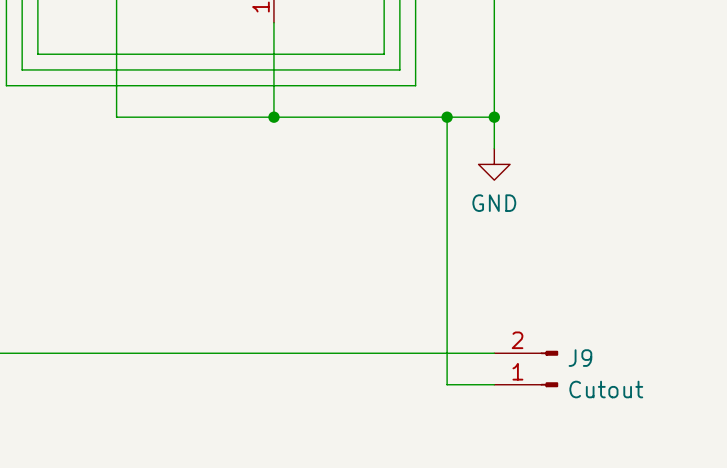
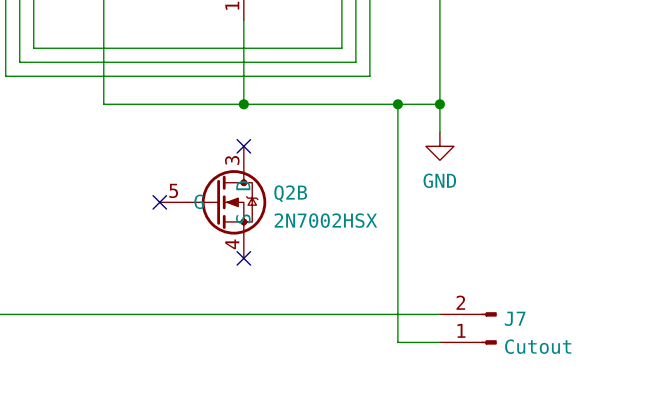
no-connect mark: none -> (243, 146)
no-connect mark: none -> (159, 202)
Q2B: none -> 2N7002HSX (213, 202)
no-connect mark: none -> (243, 258)
J9 name: J9 (580, 358) -> J7 (515, 318)

